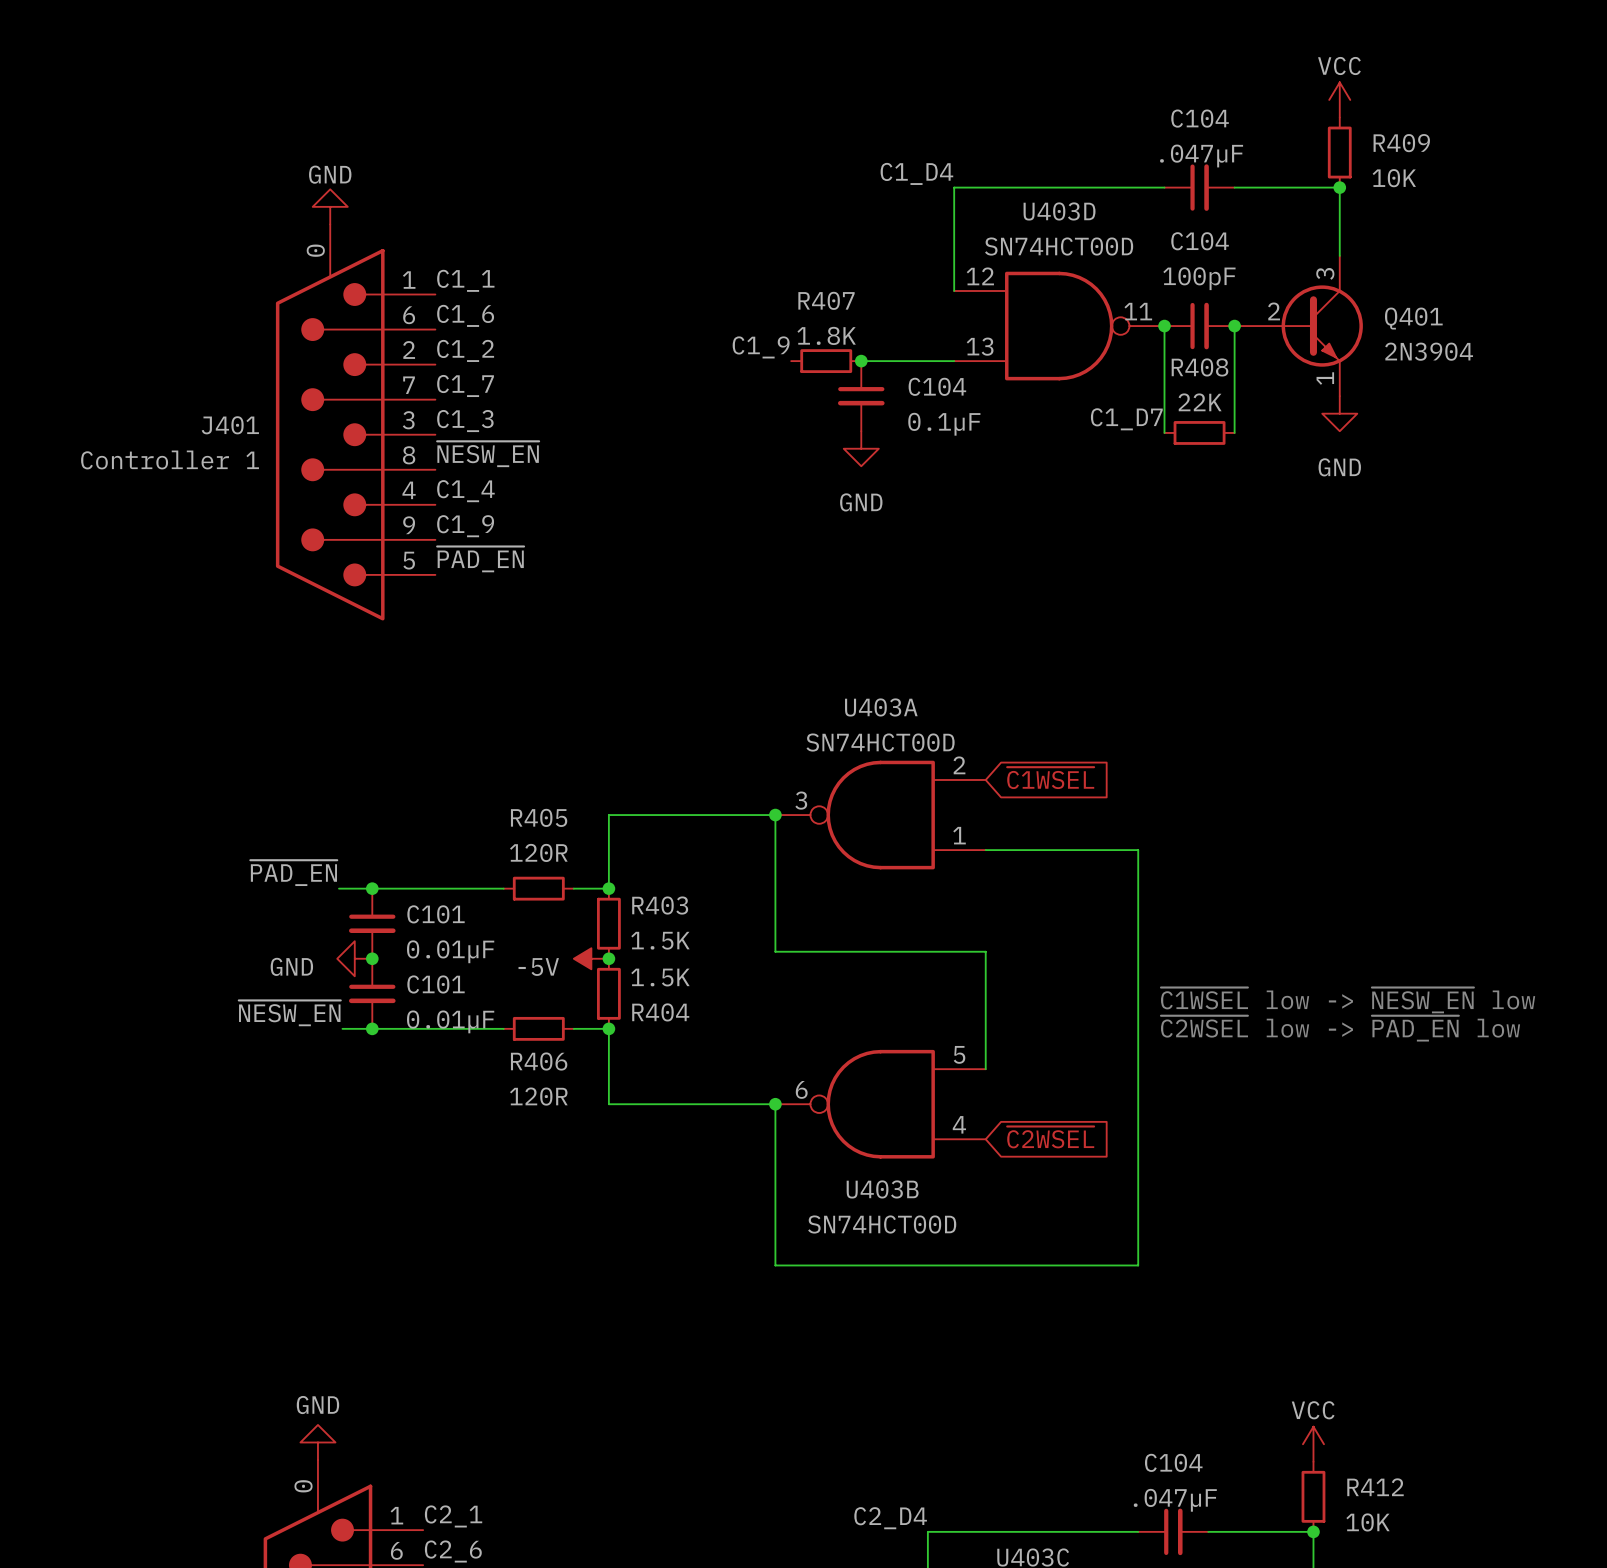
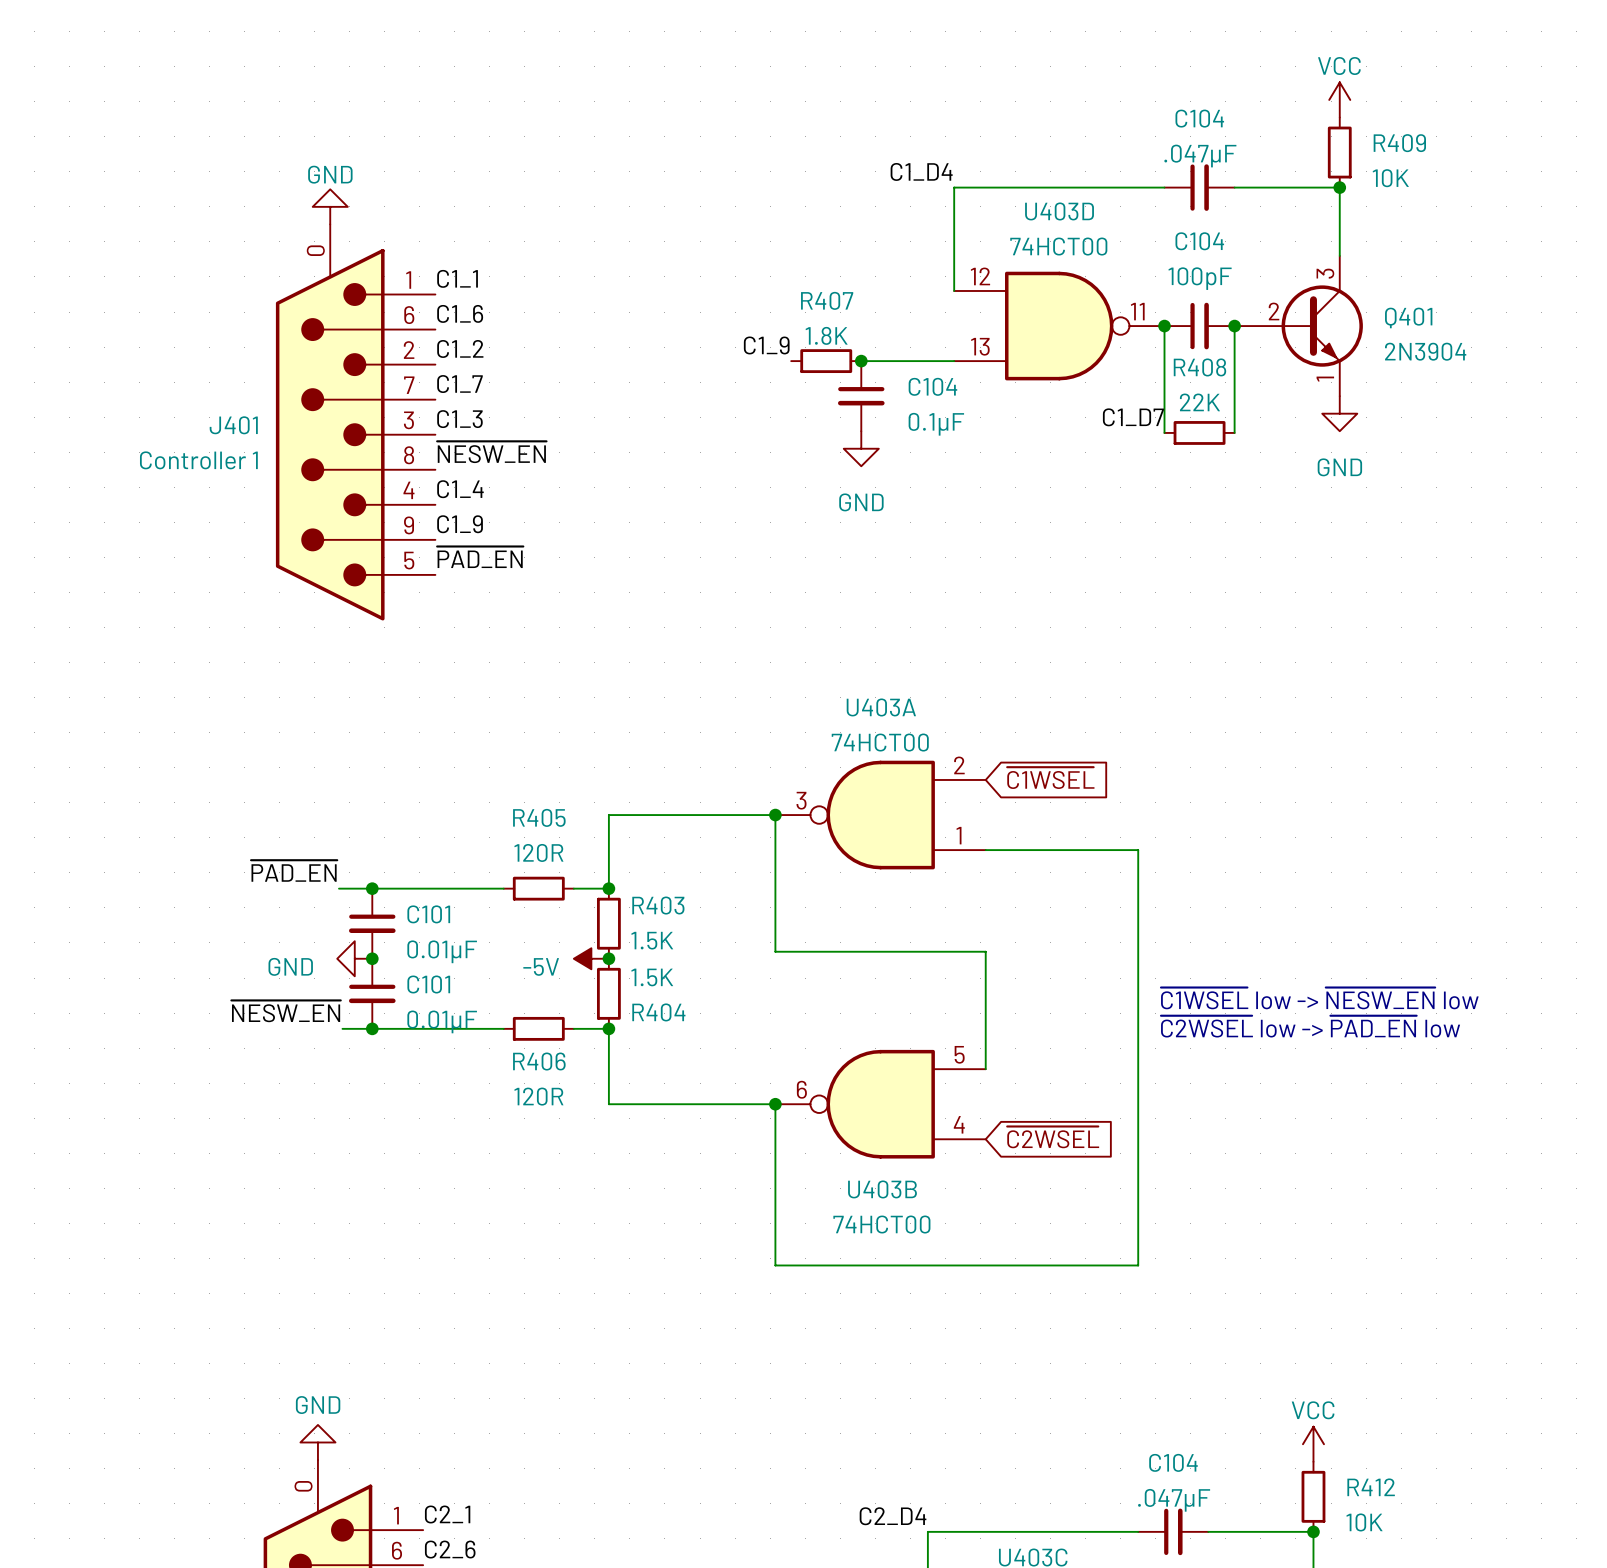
U403D value: SN74HCT00D (1059, 246) -> 74HCT00 (1058, 246)
U403A value: SN74HCT00D (880, 742) -> 74HCT00 (880, 742)
U403B value: SN74HCT00D (882, 1224) -> 74HCT00 (881, 1224)

